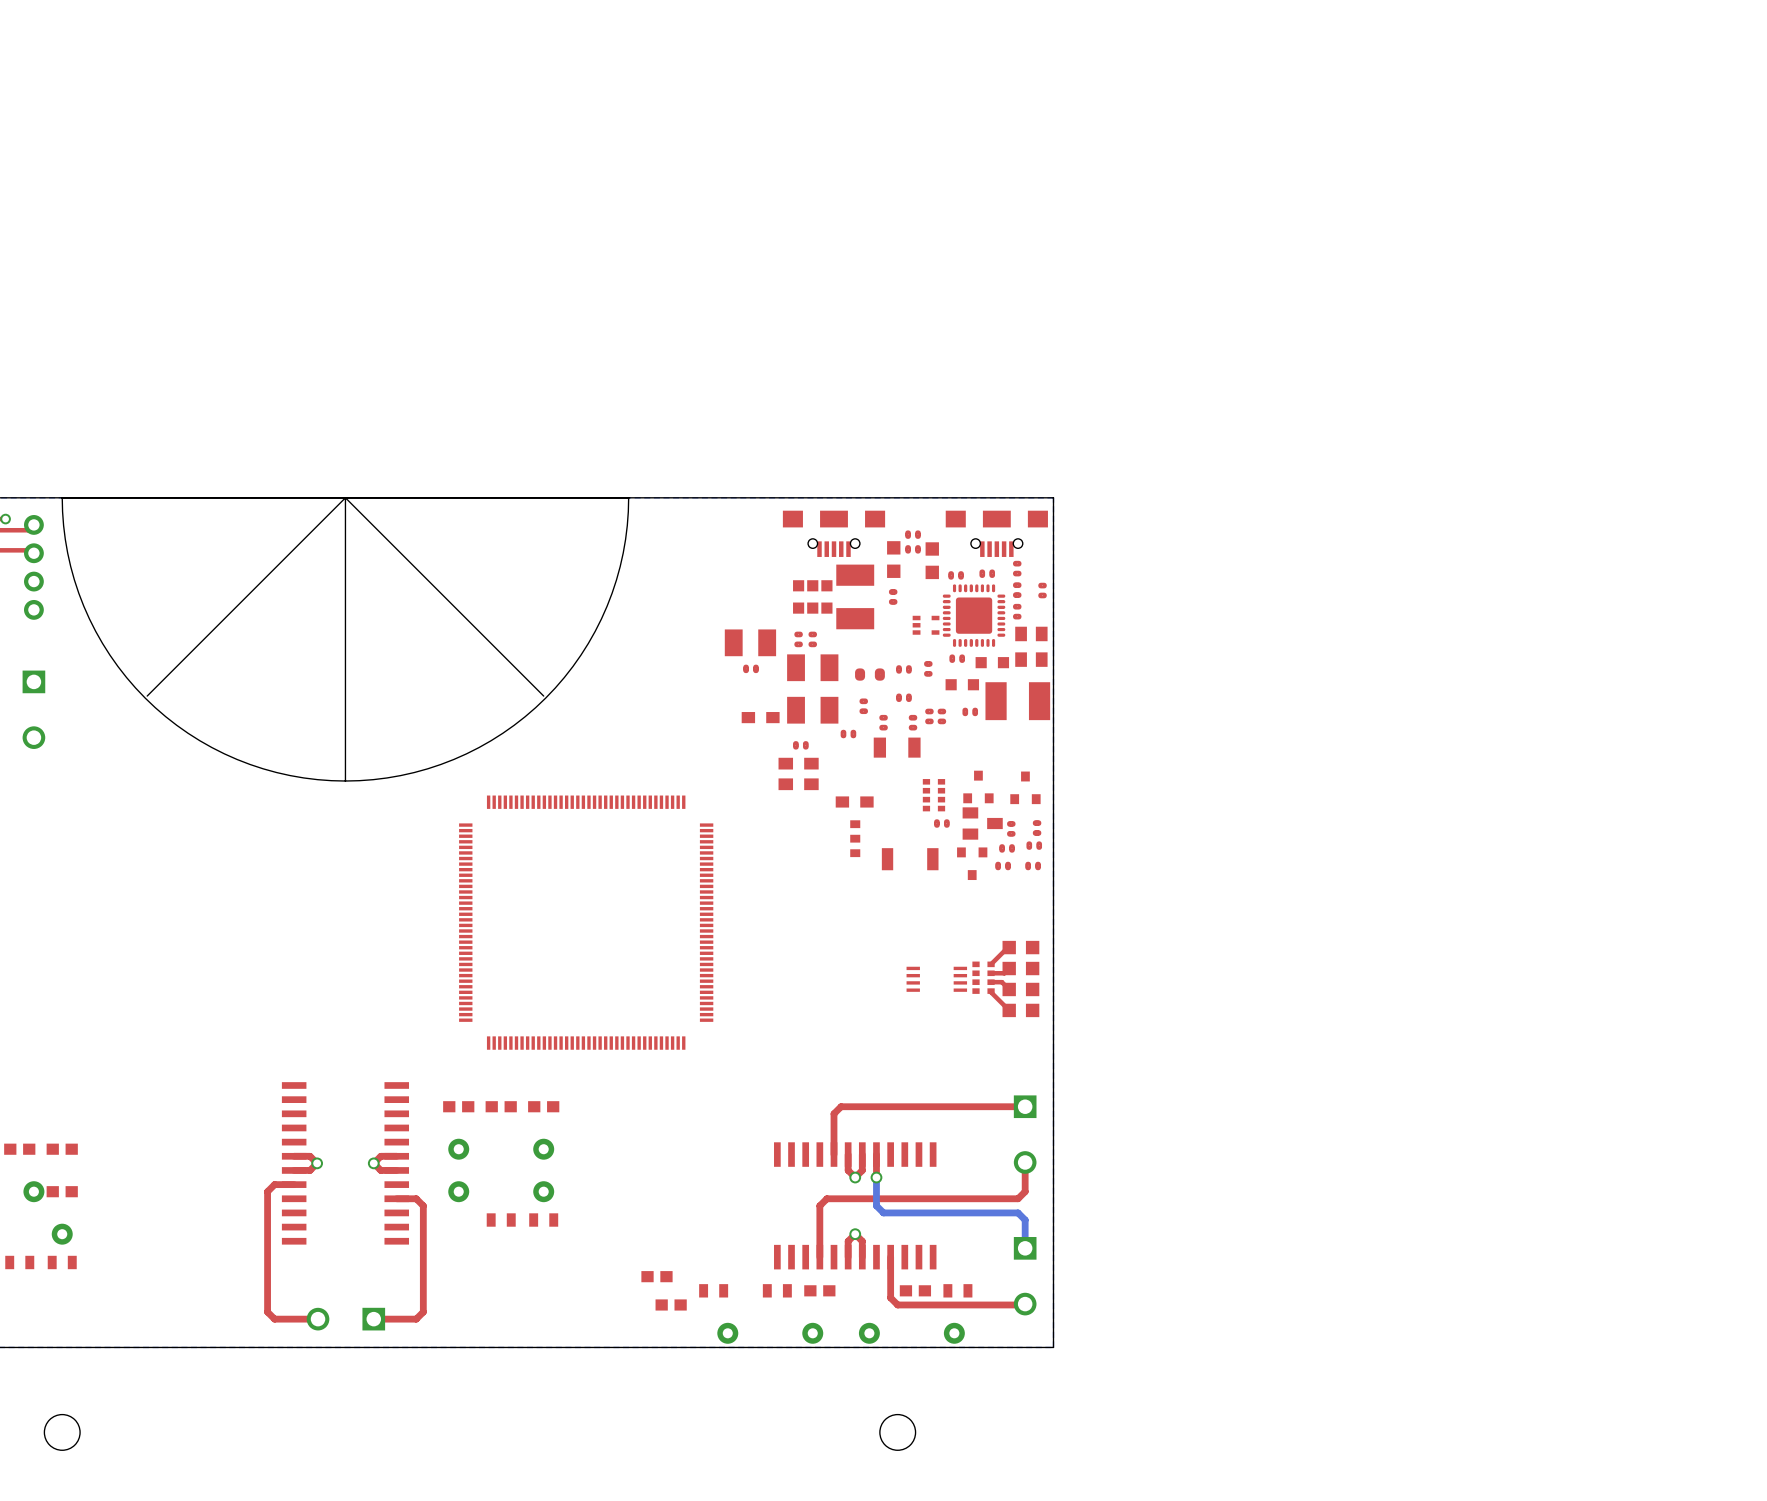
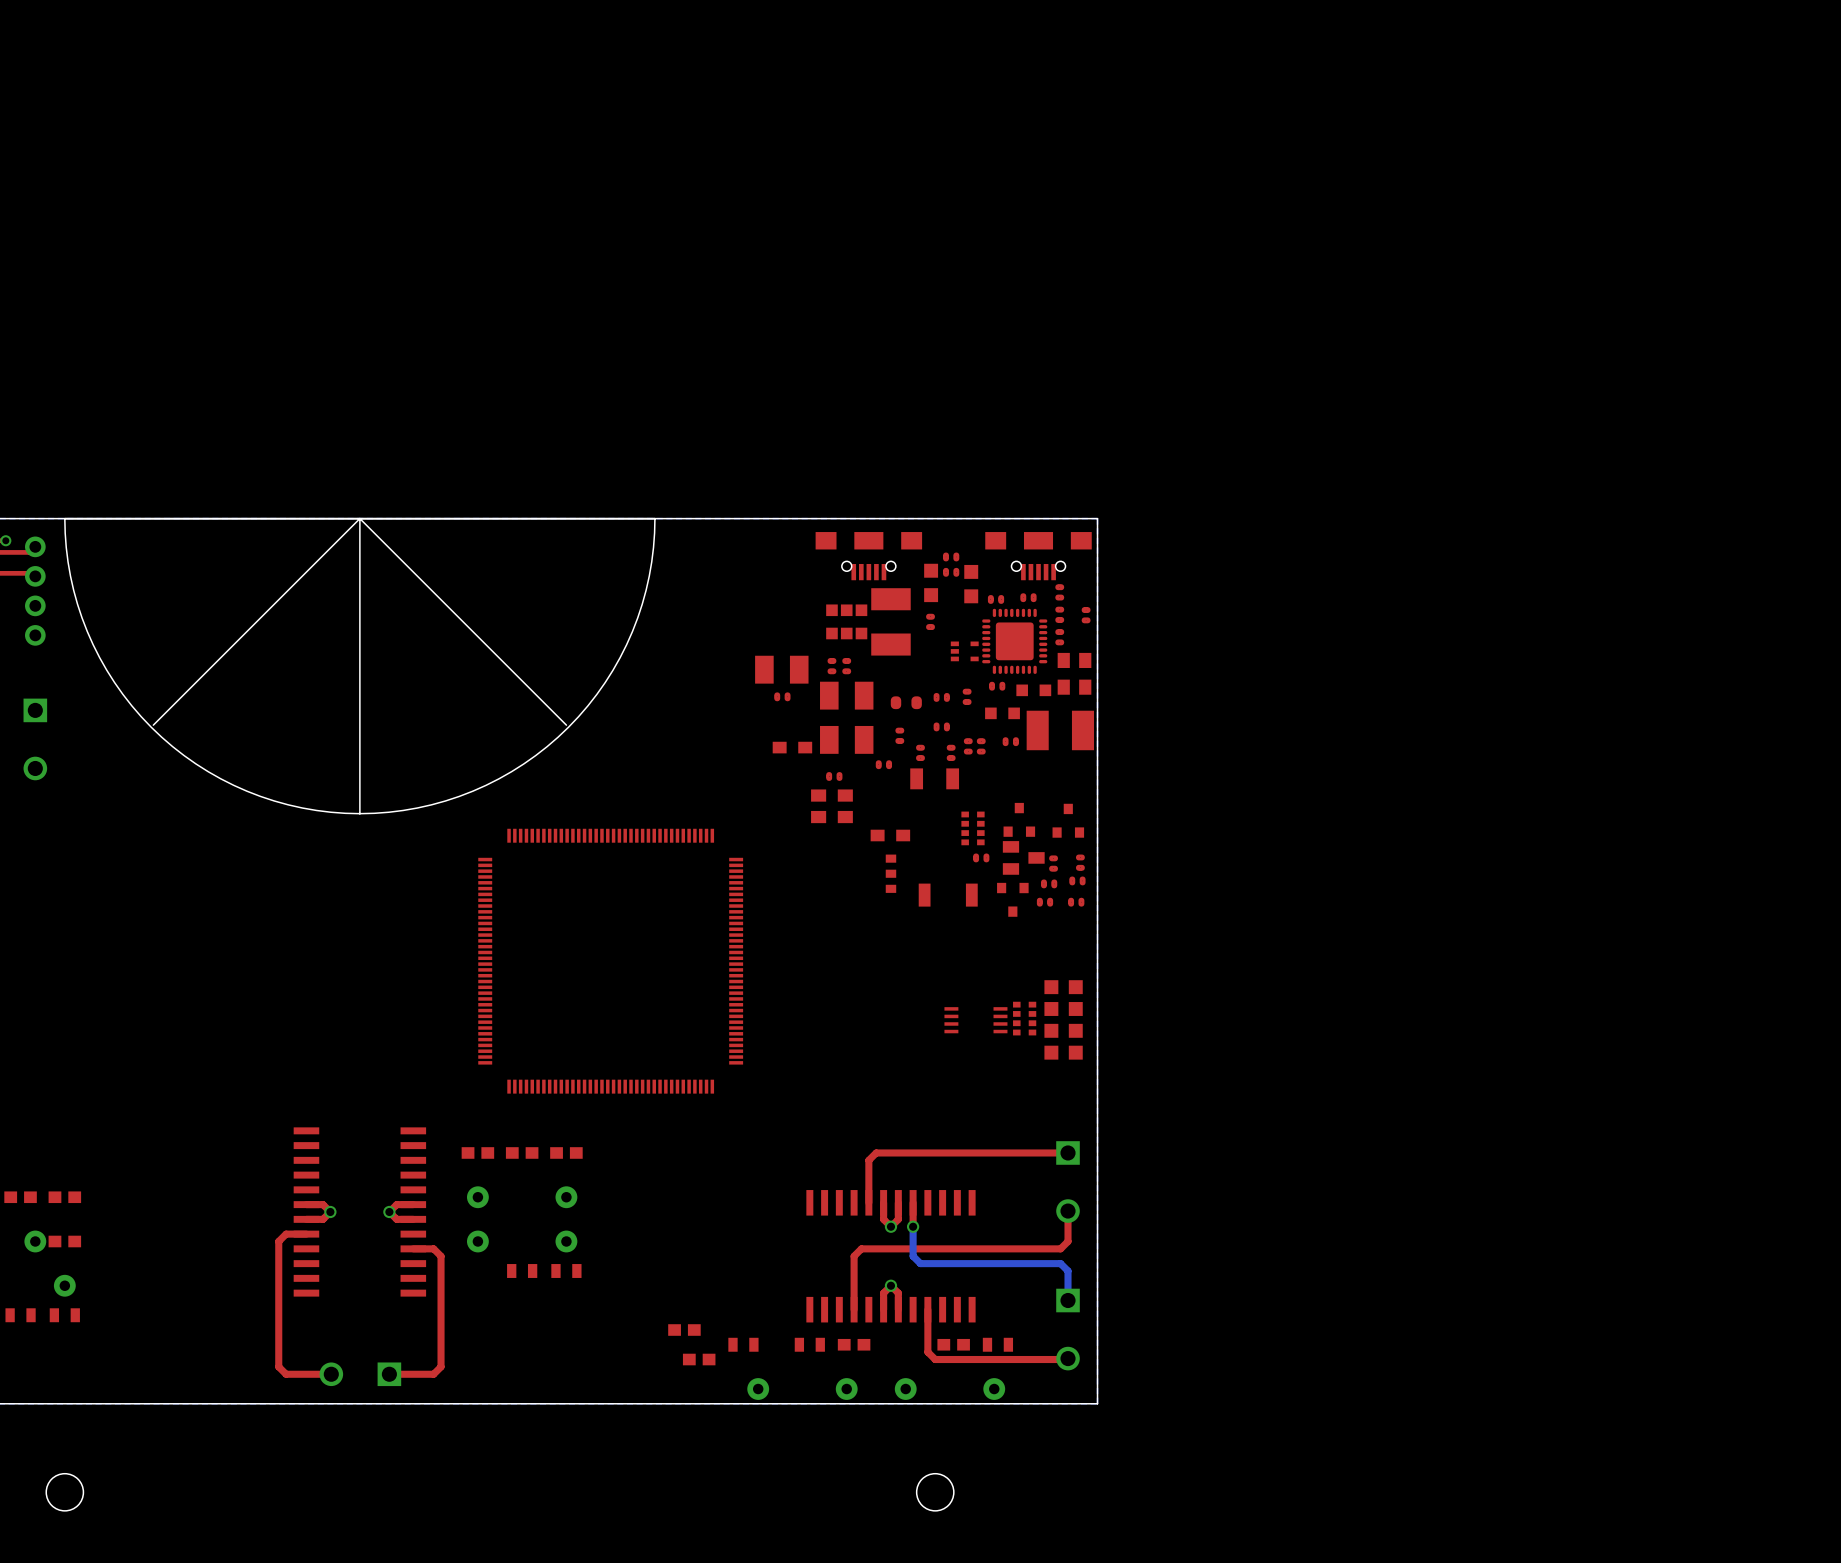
top track: (1009, 947) (991, 964) -> none
top track: (1009, 968) (1004, 973) (991, 973) -> none
top track: (991, 982) (1001, 982) (1009, 989) -> none
top track: (991, 991) (1009, 1010) -> none

